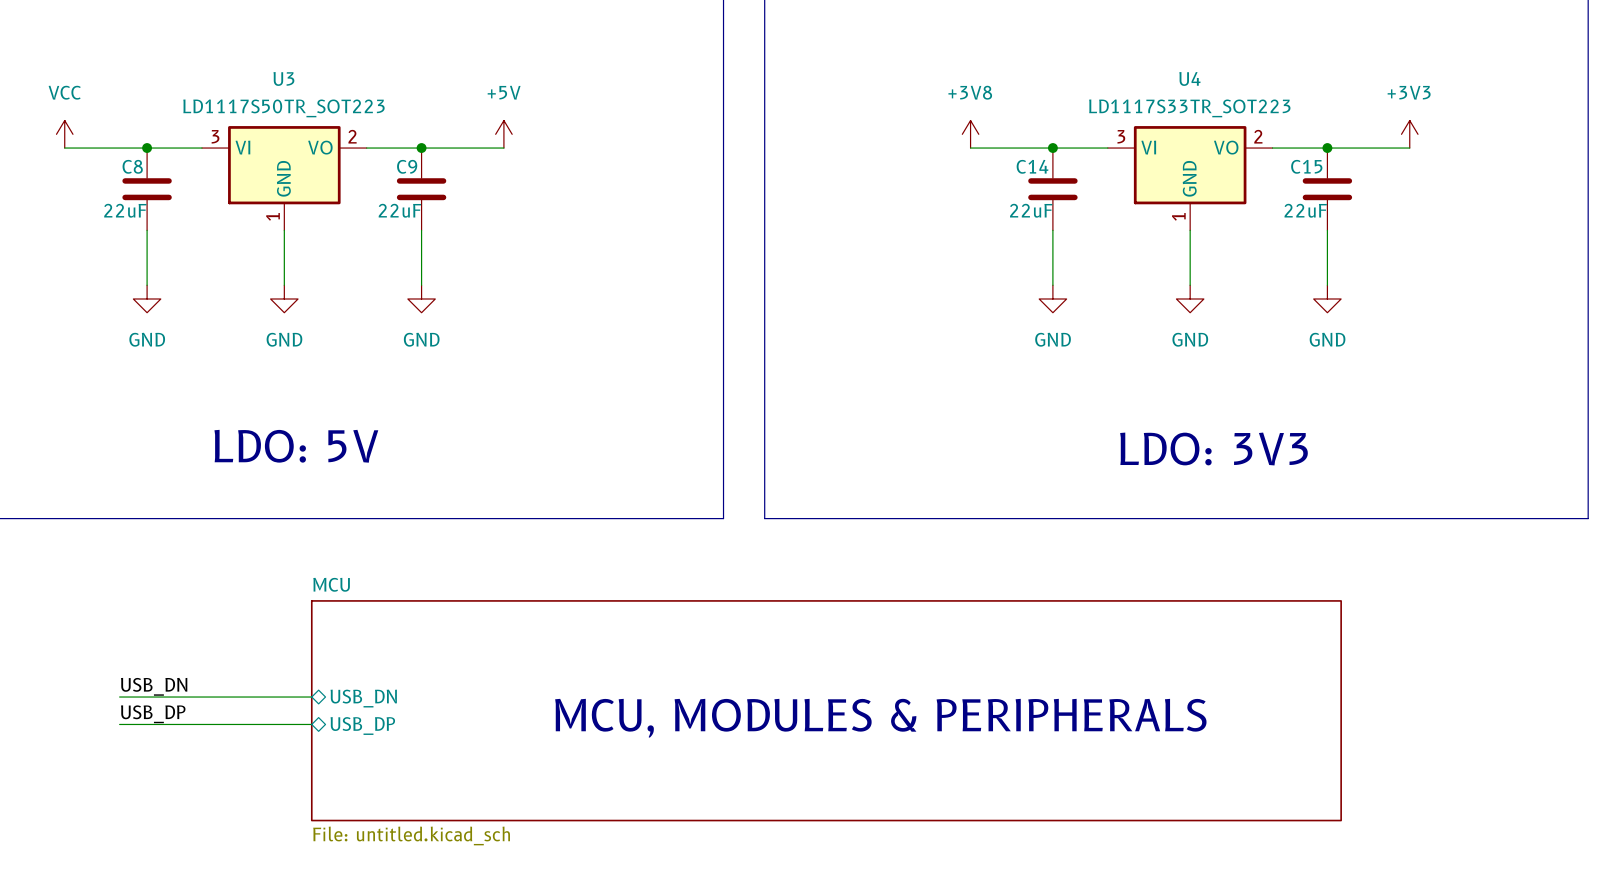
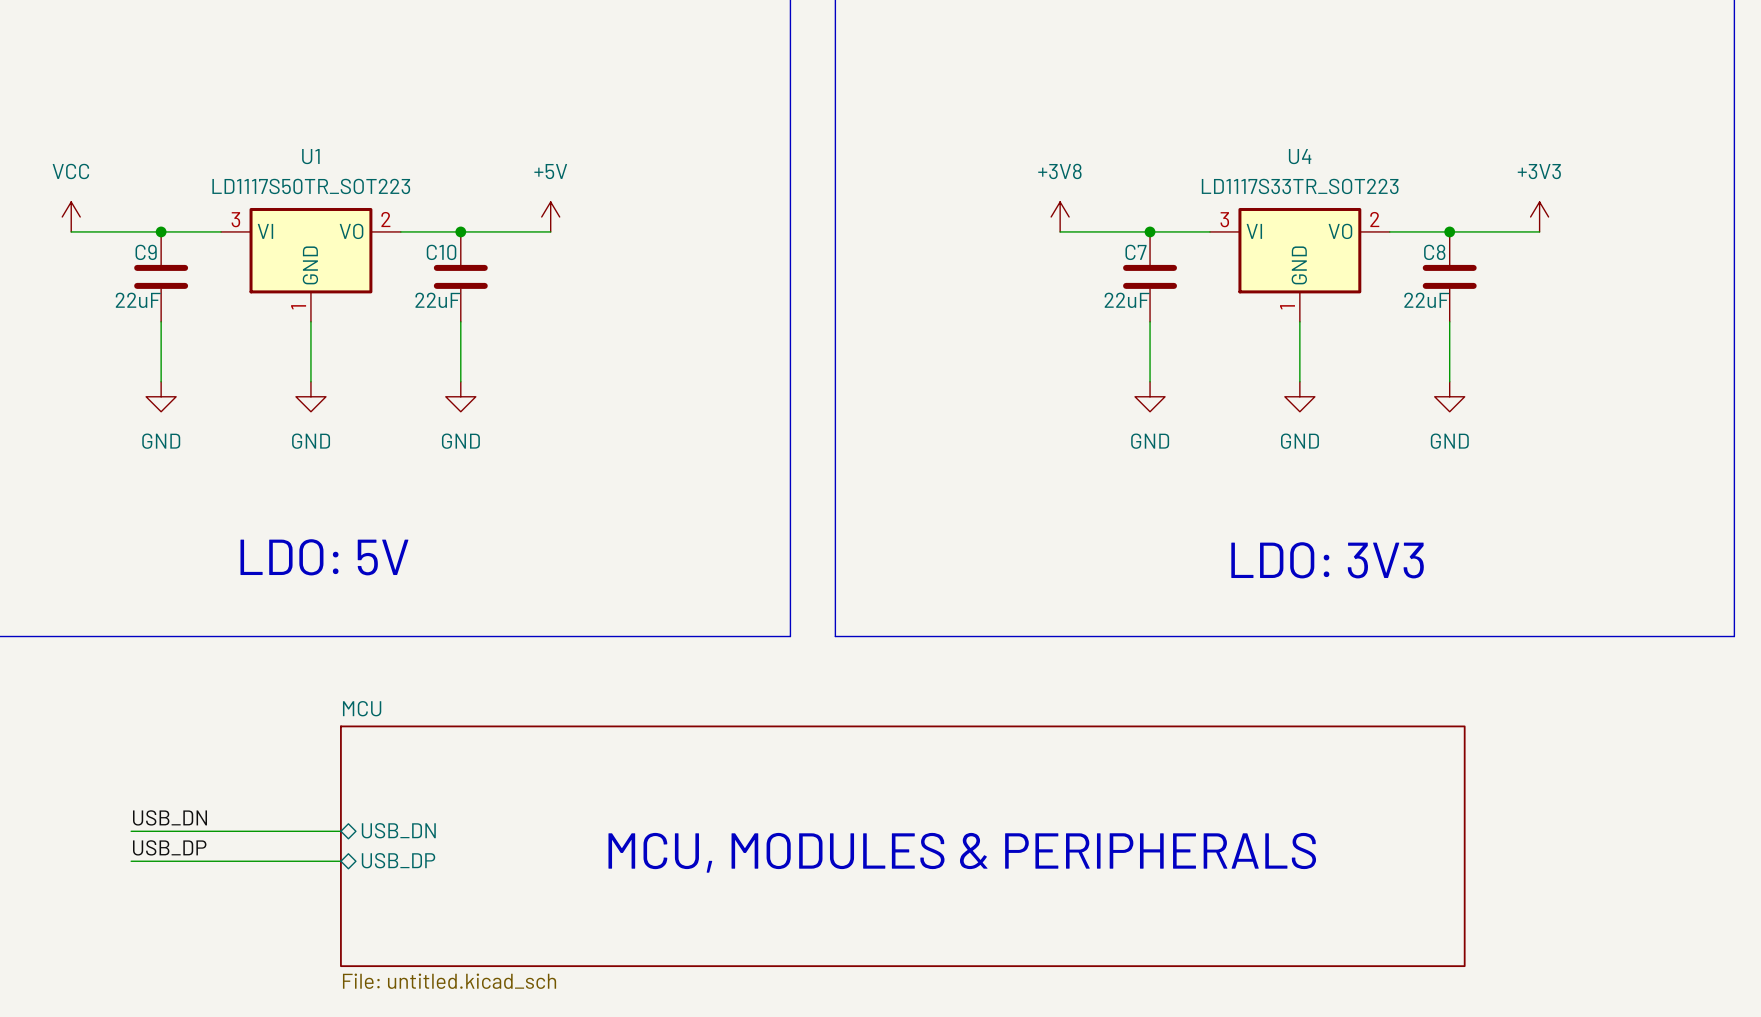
U3 name: U3 (283, 78) -> U1 (310, 156)
C8 name: C8 (132, 166) -> C9 (146, 252)
C9 name: C9 (407, 166) -> C10 (441, 252)
C14 name: C14 (1032, 166) -> C7 (1136, 252)
C15 name: C15 (1306, 166) -> C8 (1434, 252)

